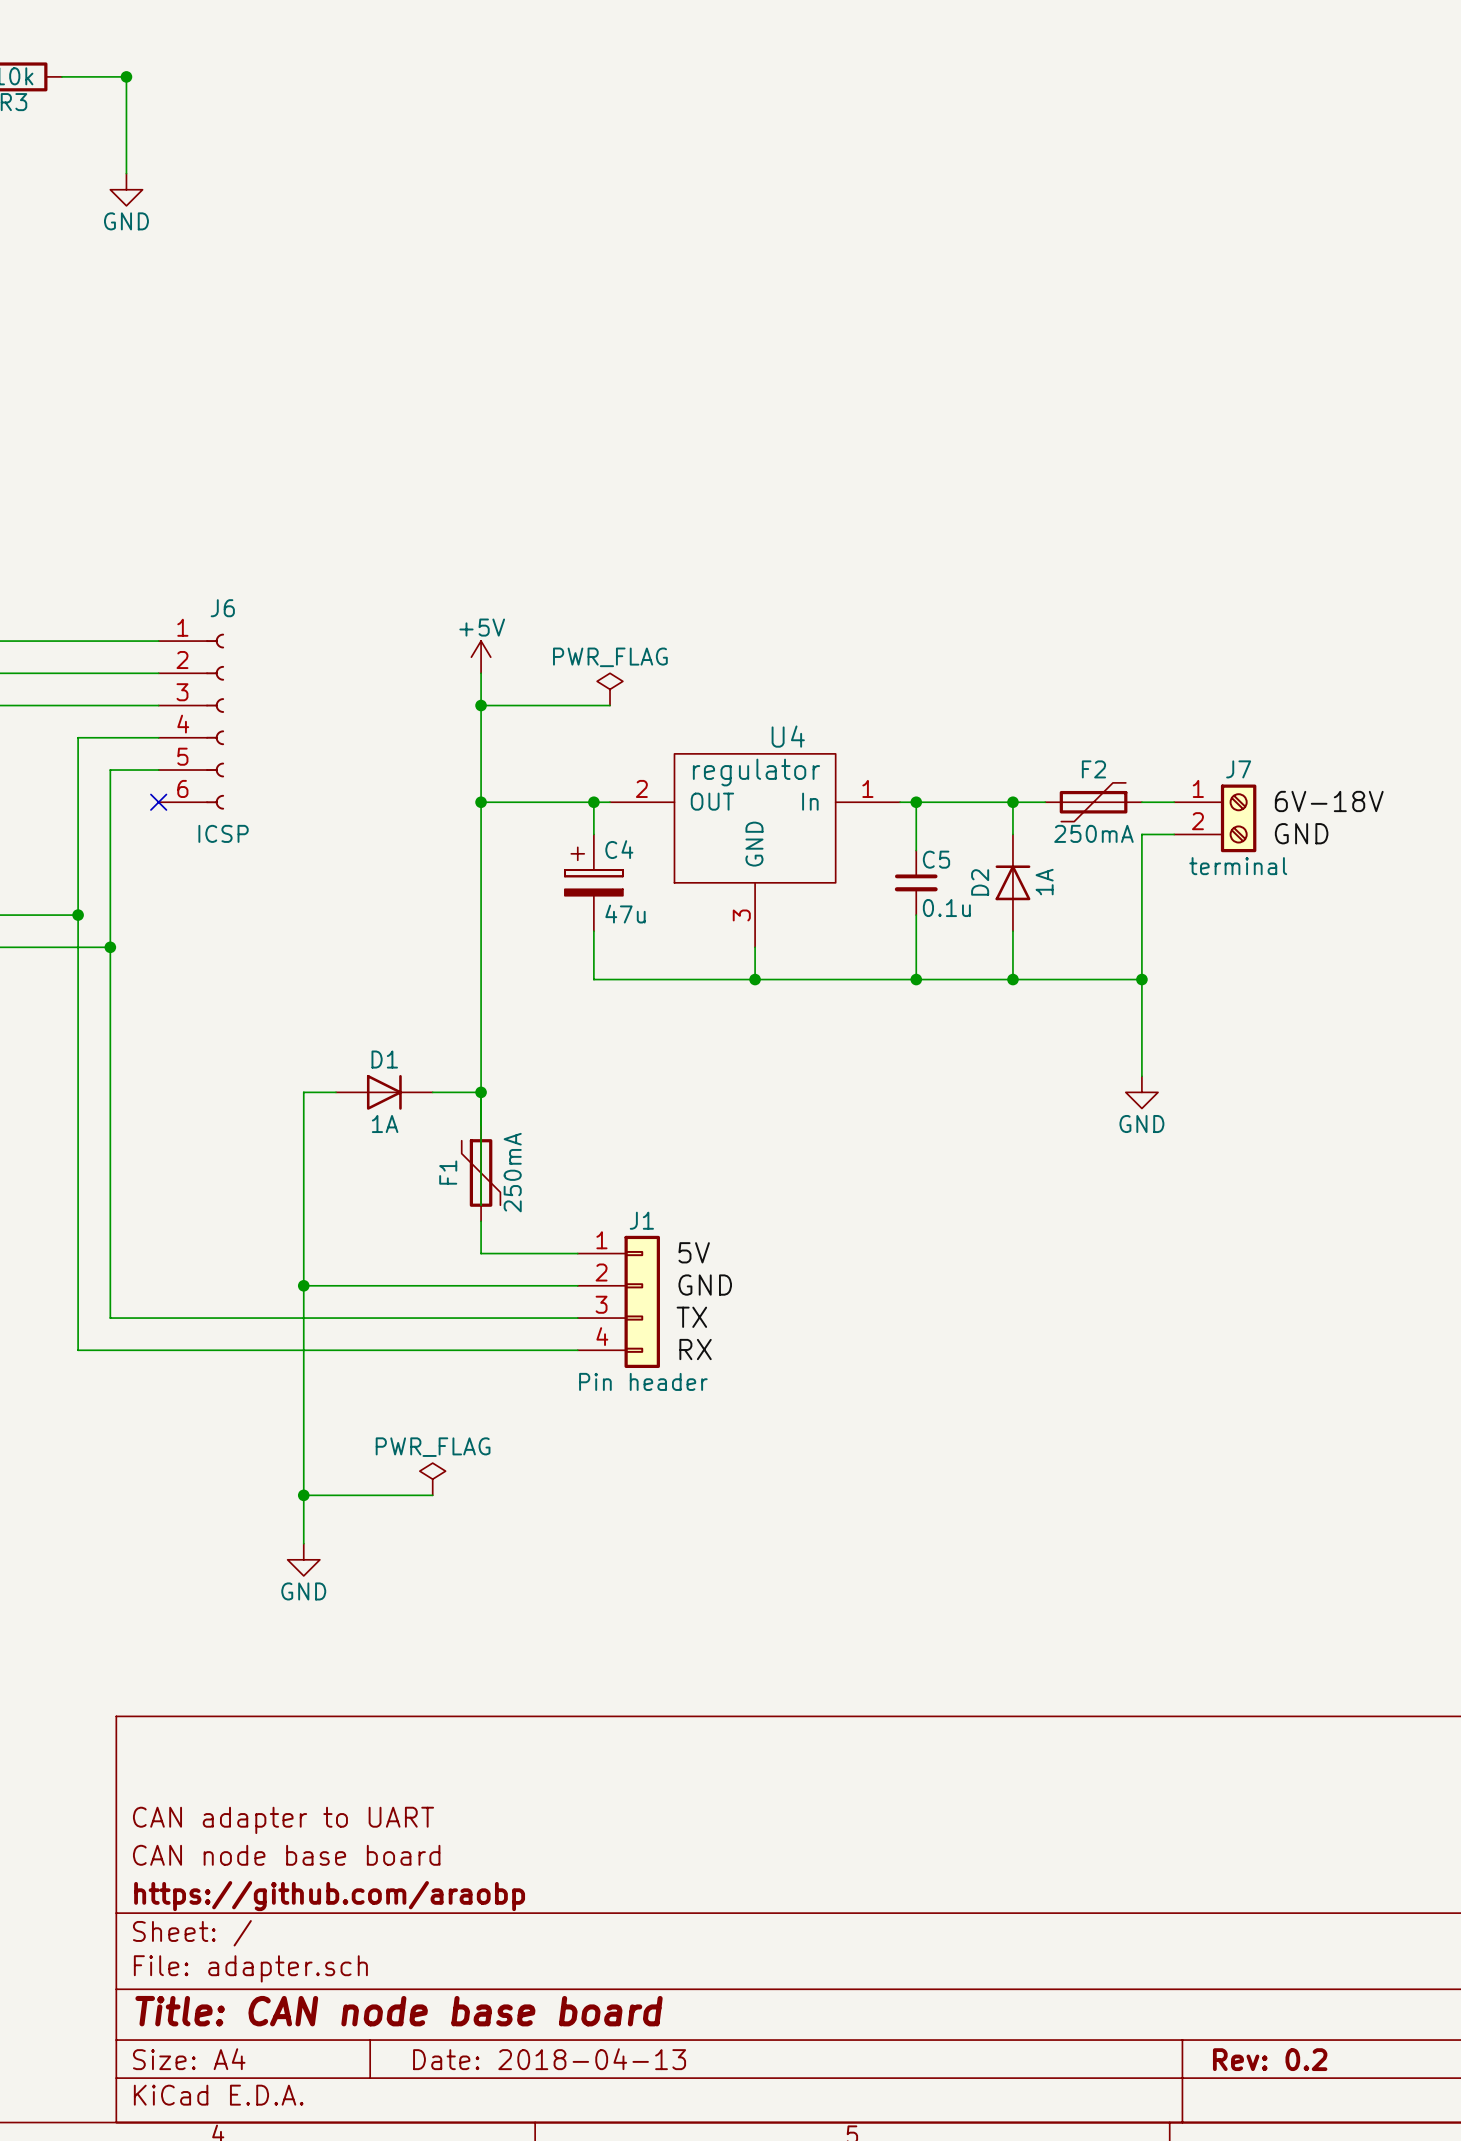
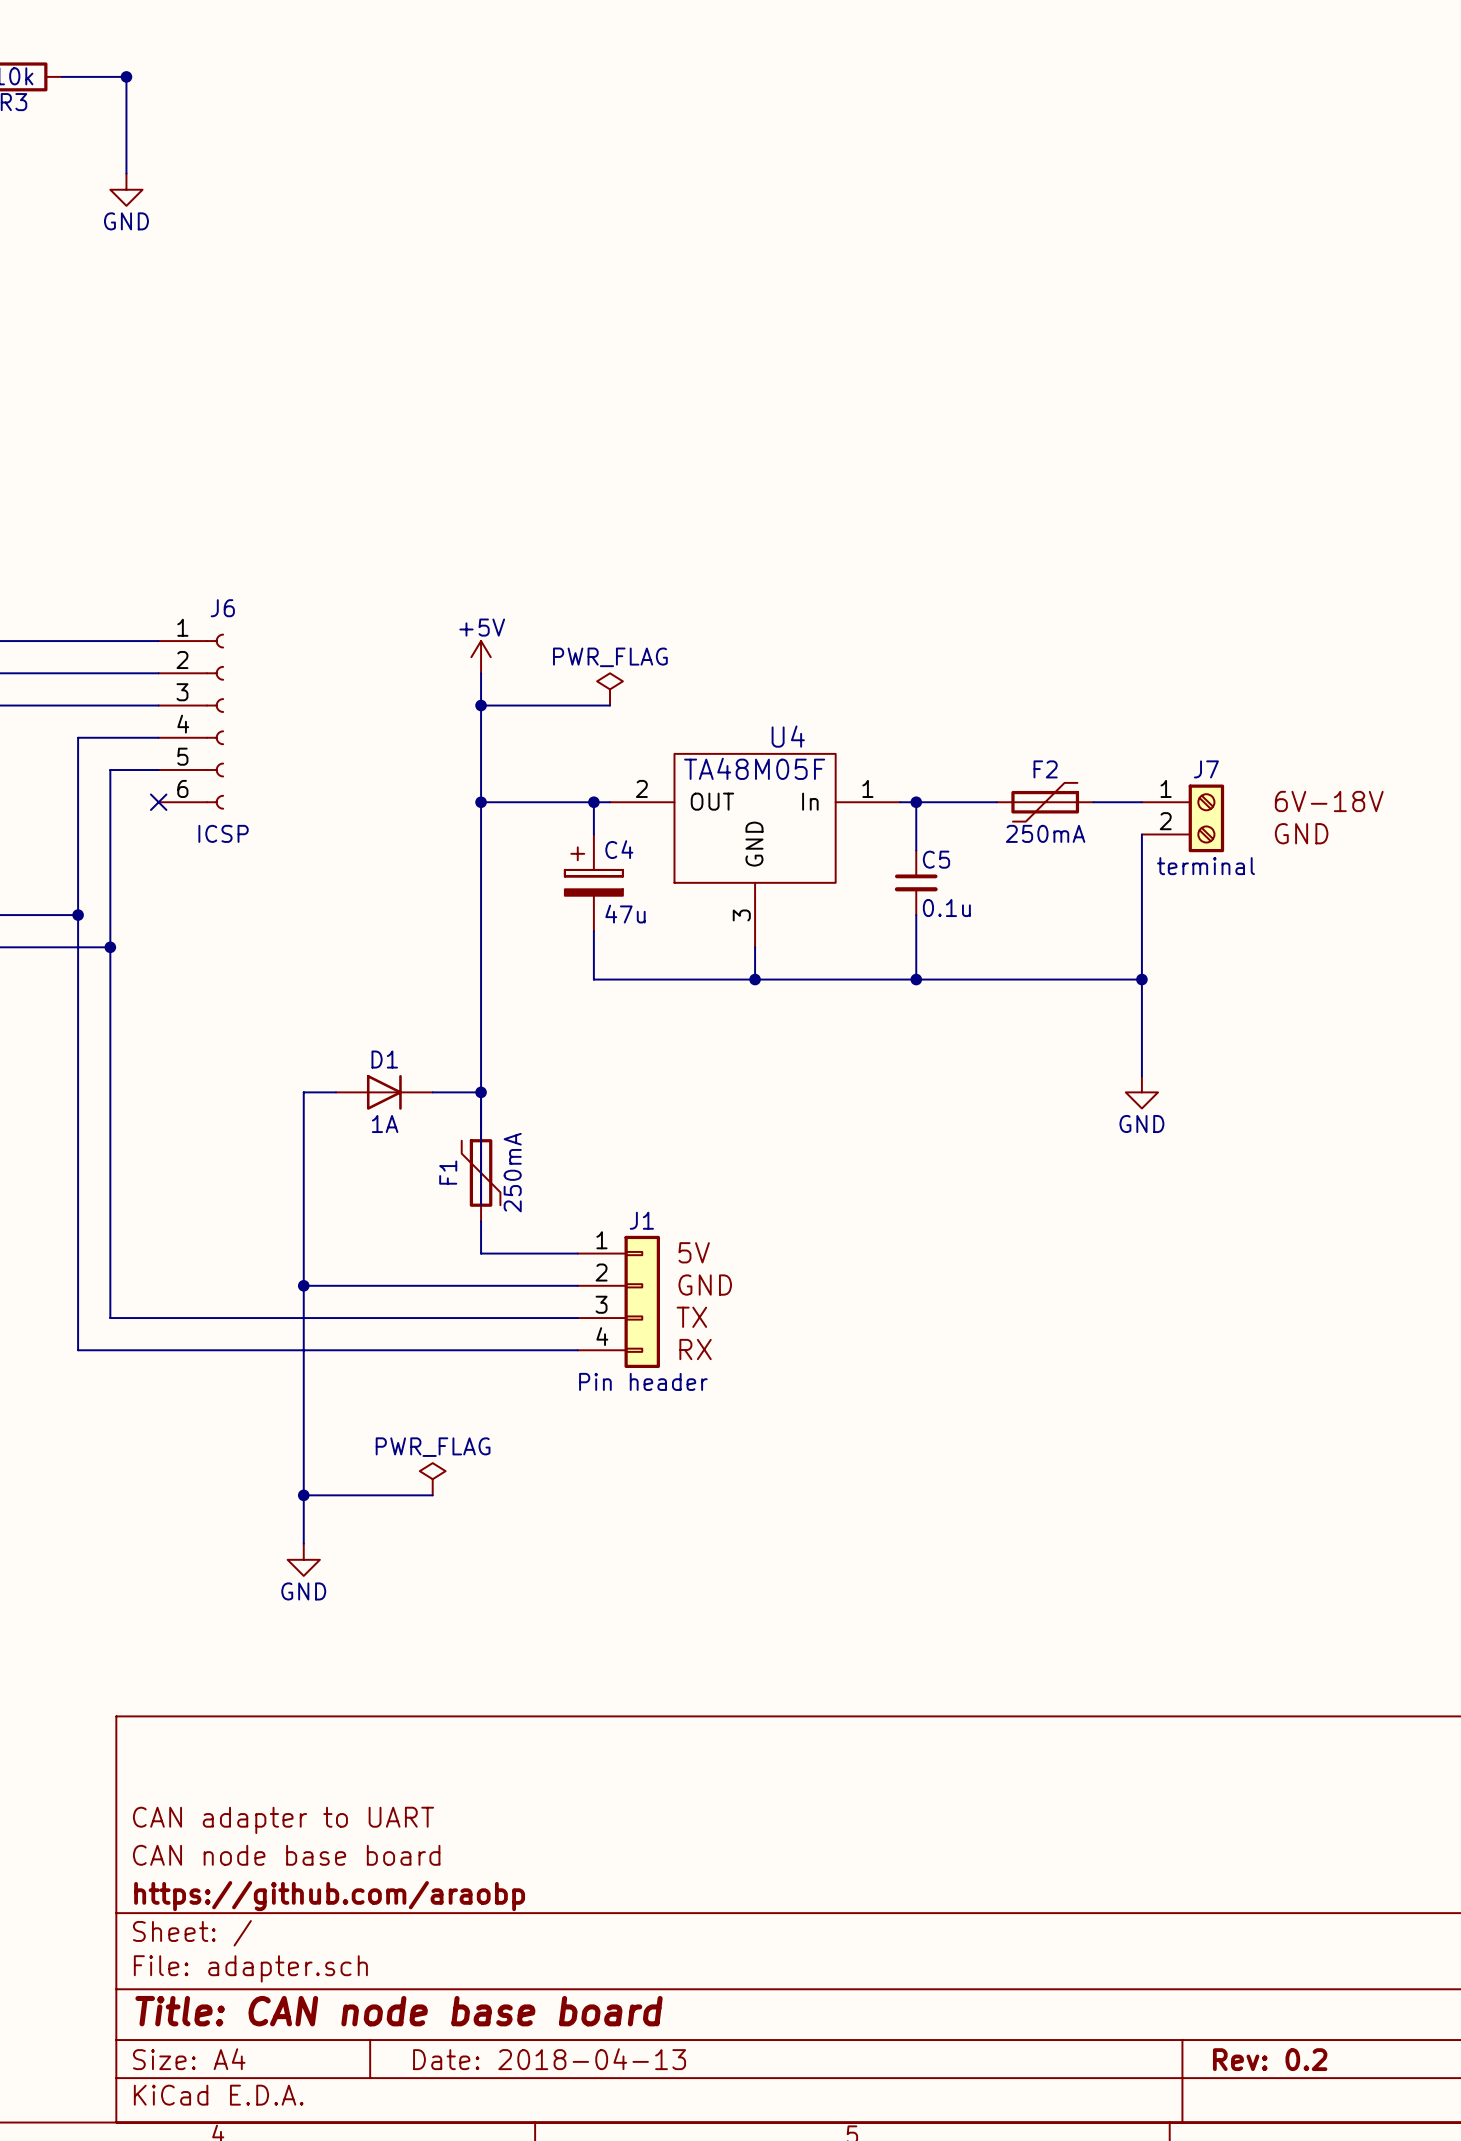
U4 value: regulator (756, 772) -> TA48M05F (754, 768)
wire: (1012, 802) (1012, 834) -> none
junction: (1012, 802) -> none
F2 position: (1093, 802) -> (1045, 802)
J7 position: (1215, 818) -> (1183, 818)
D2: 1A (1012, 882) -> none
wire: (1012, 931) (1012, 979) -> none
junction: (1012, 979) -> none

